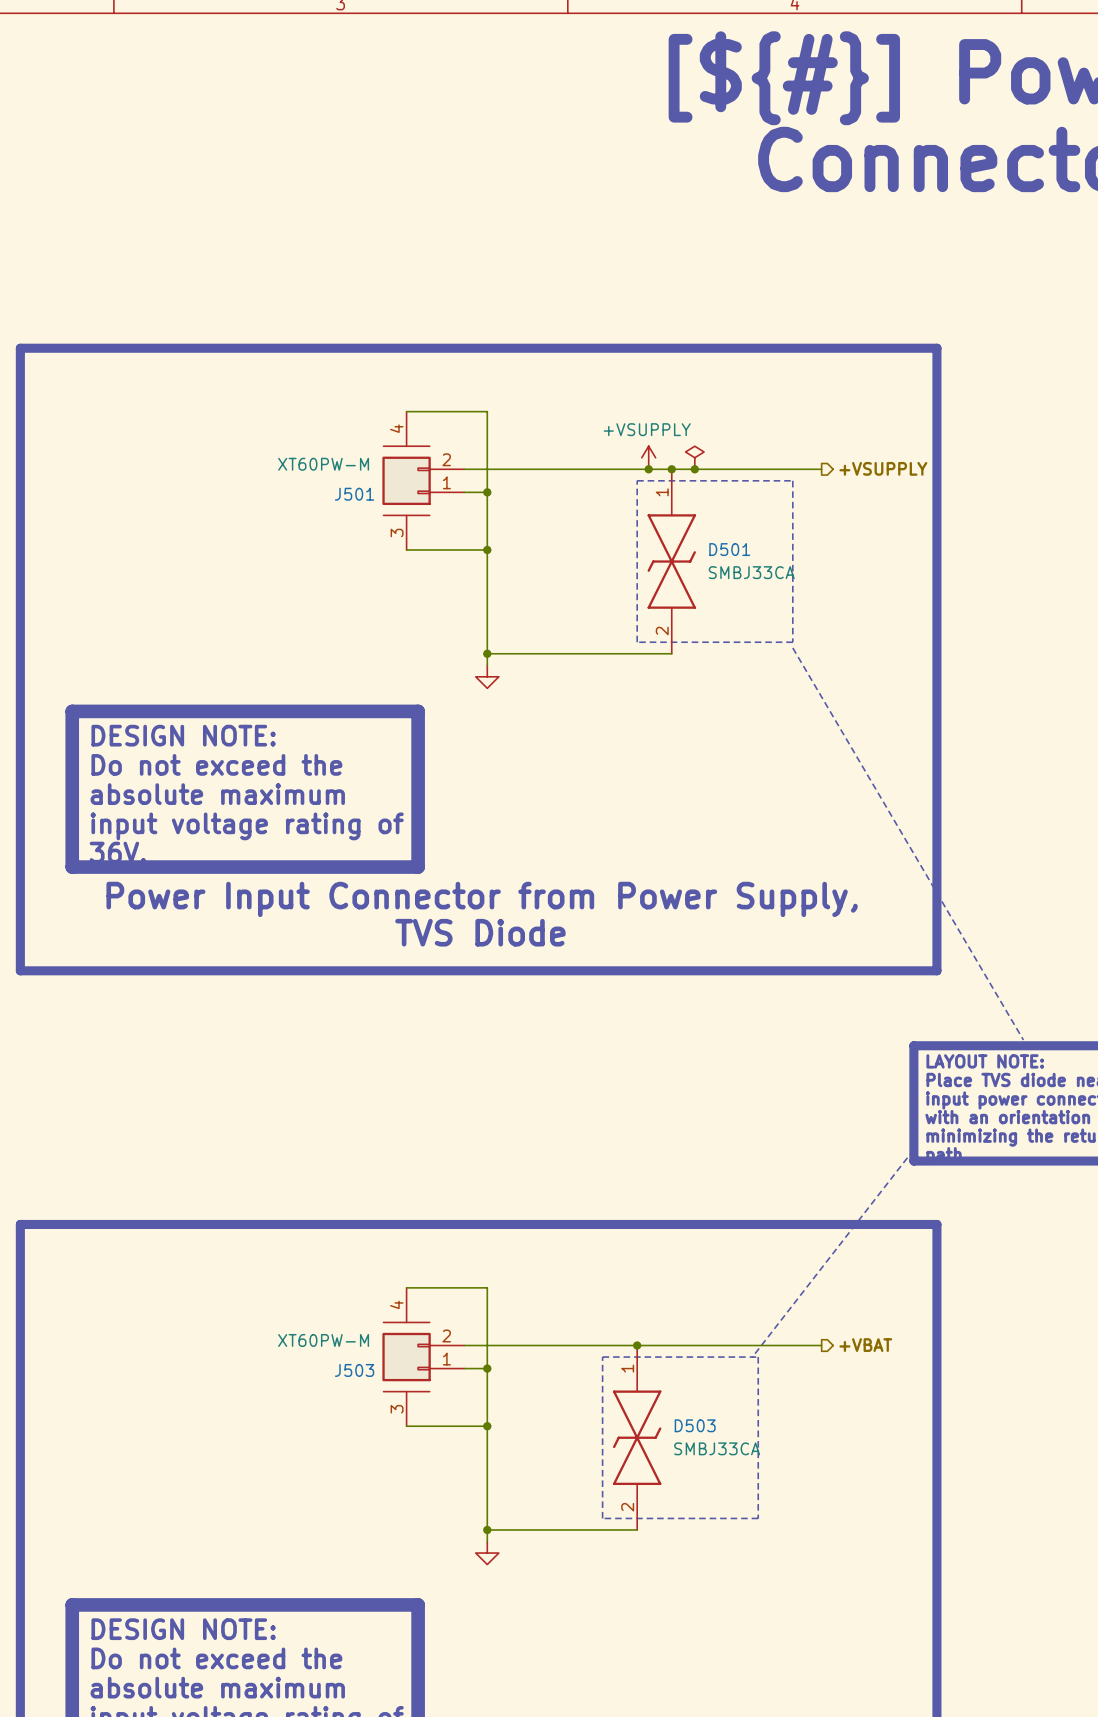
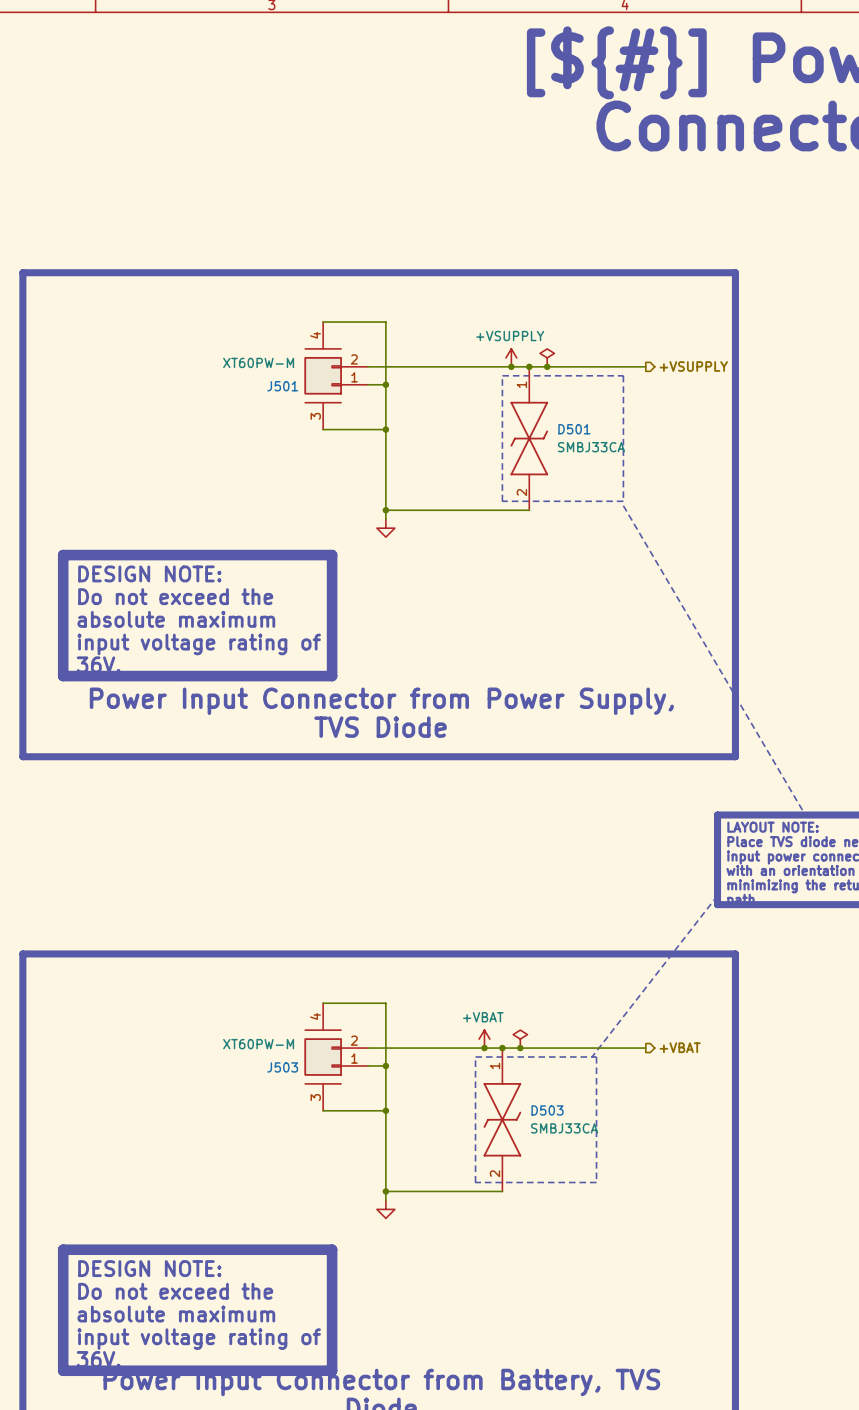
power symbol: none -> +VBAT (484, 1039)
power symbol: none -> (520, 1039)
junction: none -> (484, 1048)
junction: none -> (520, 1048)

